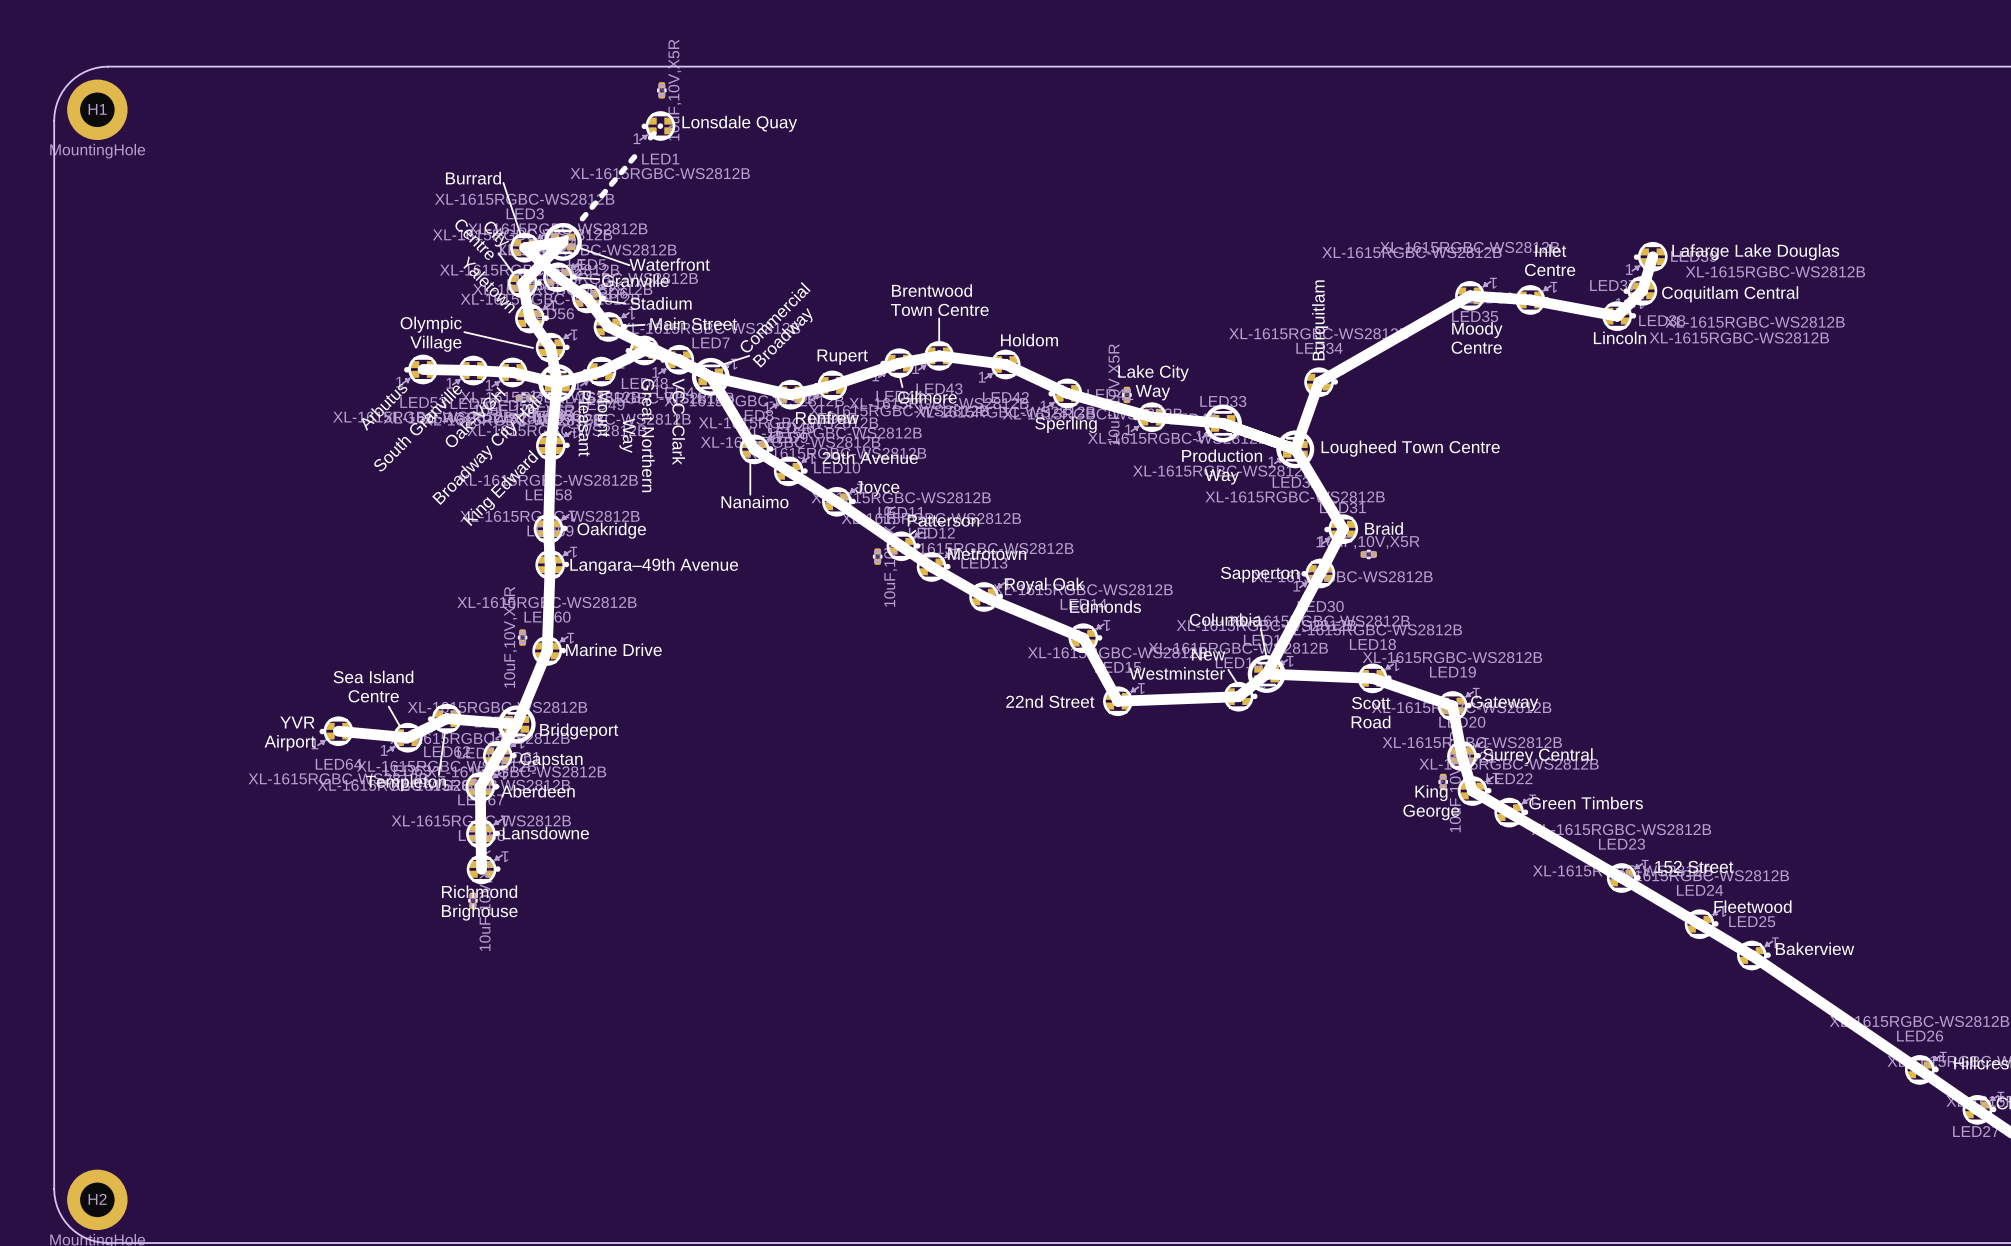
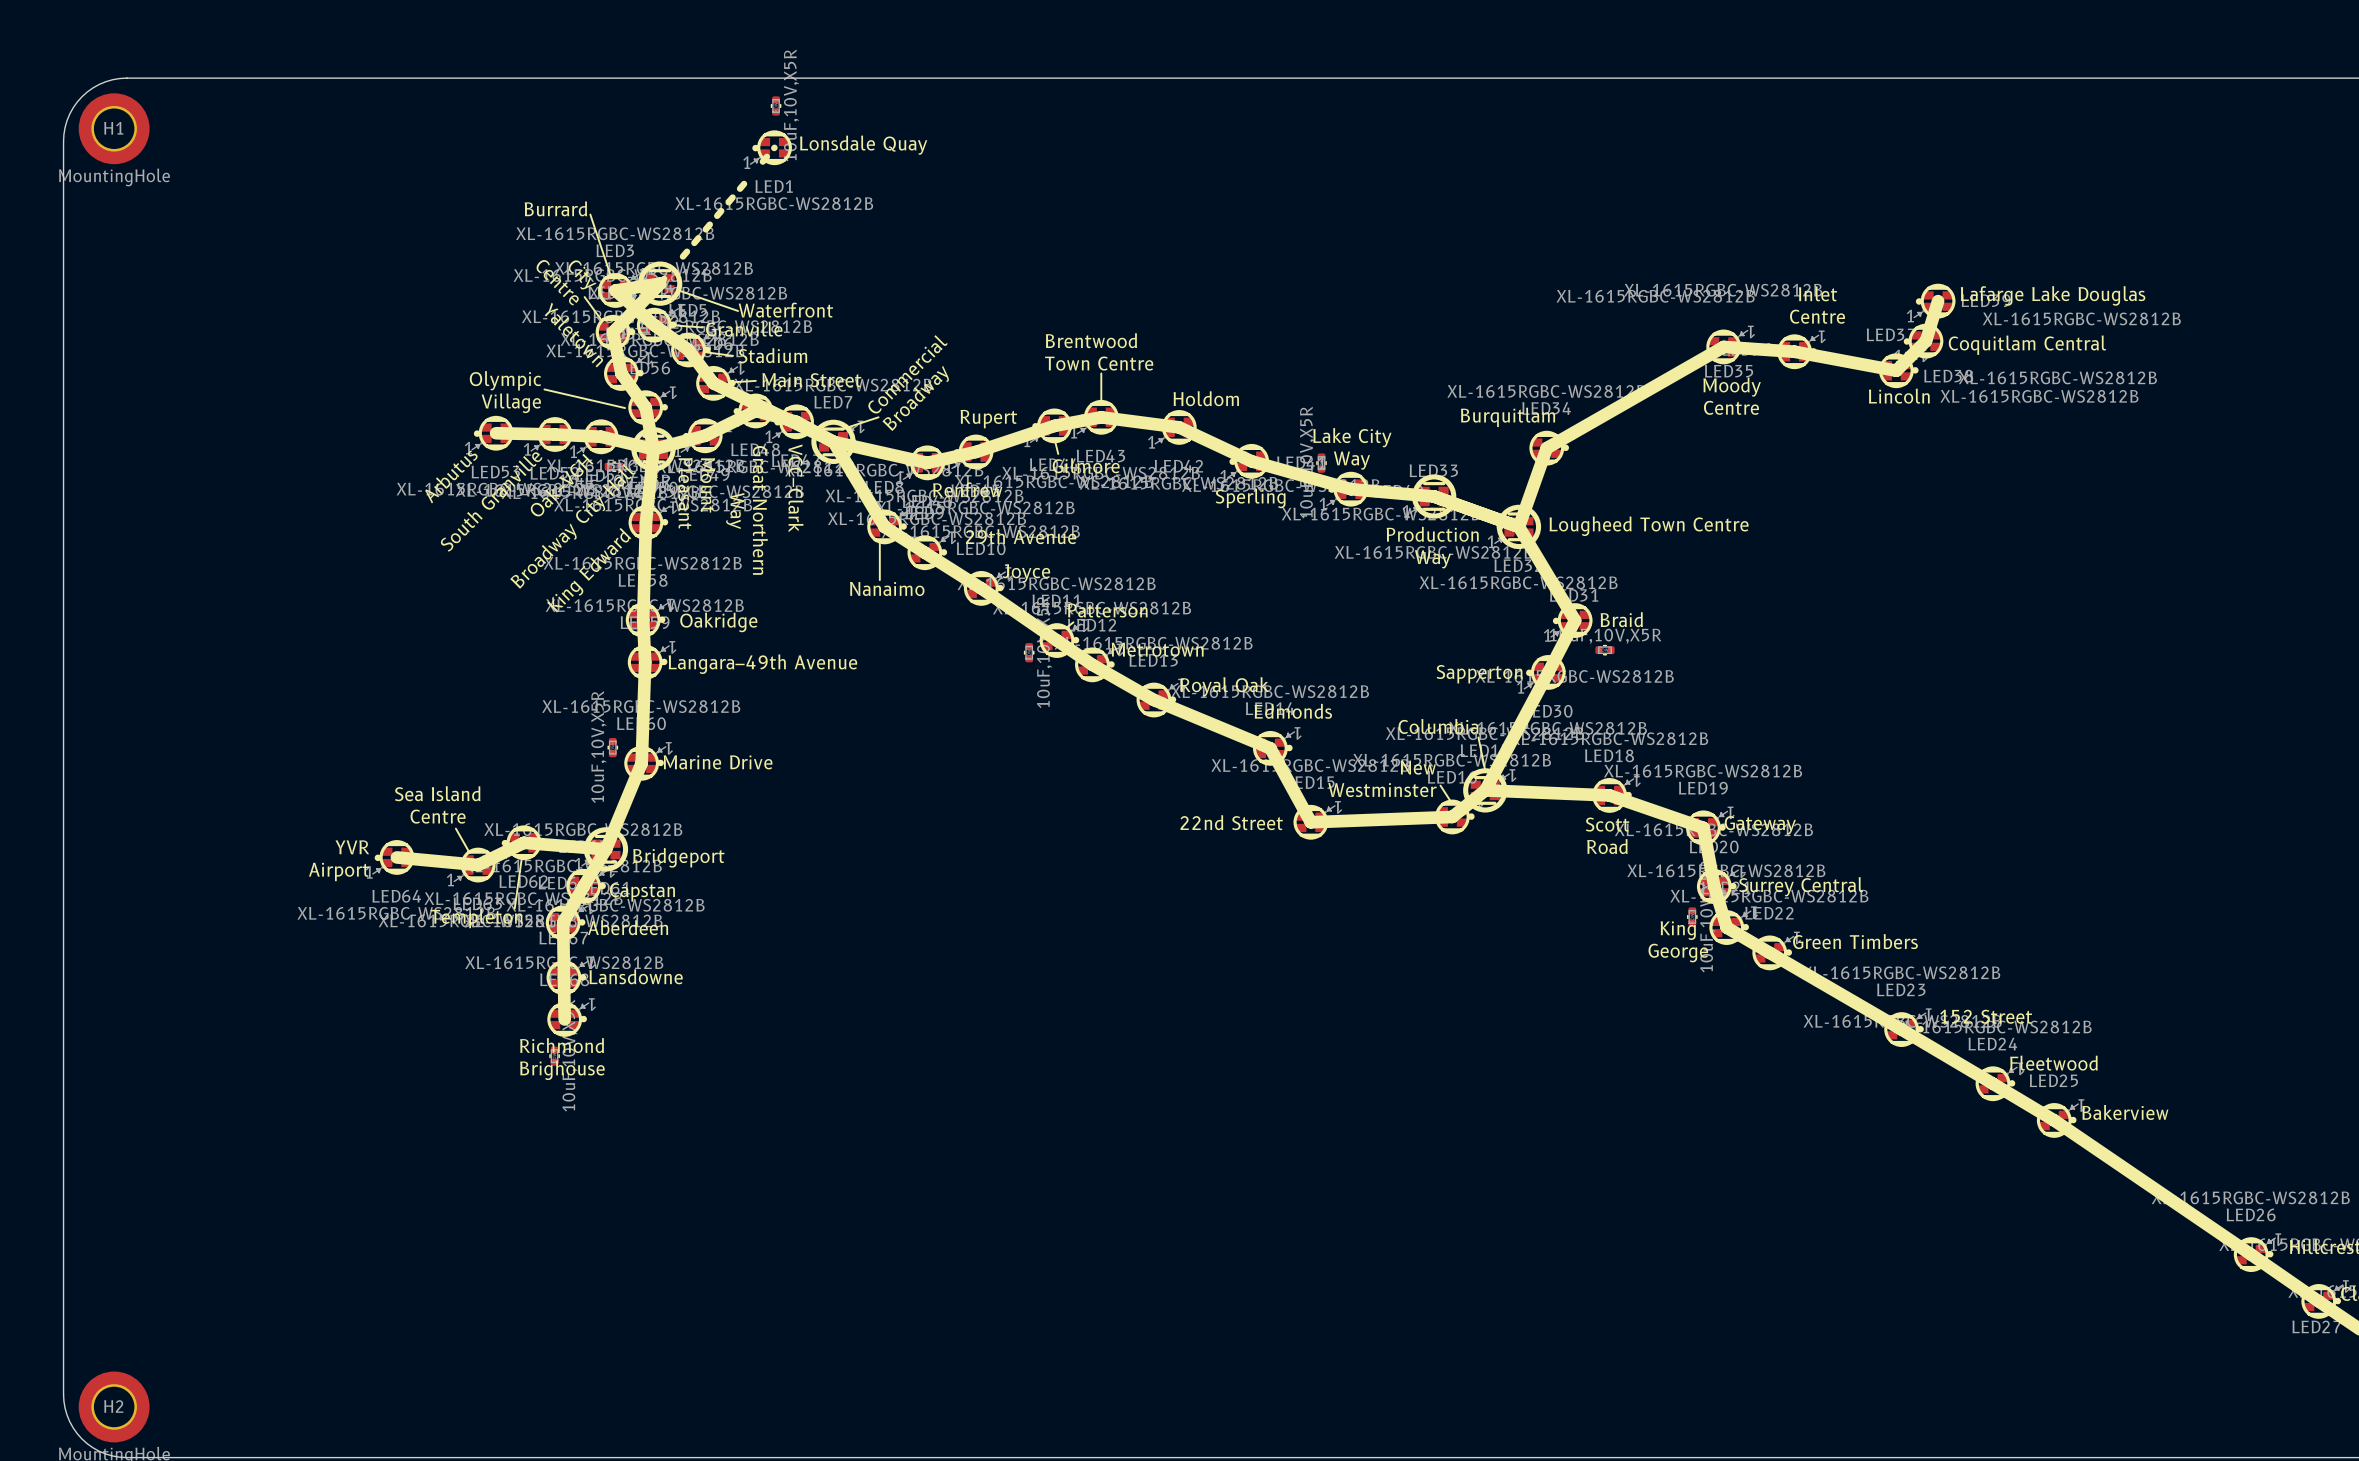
text rotation: 0° (1320, 320) -> 90° clockwise (1508, 417)

